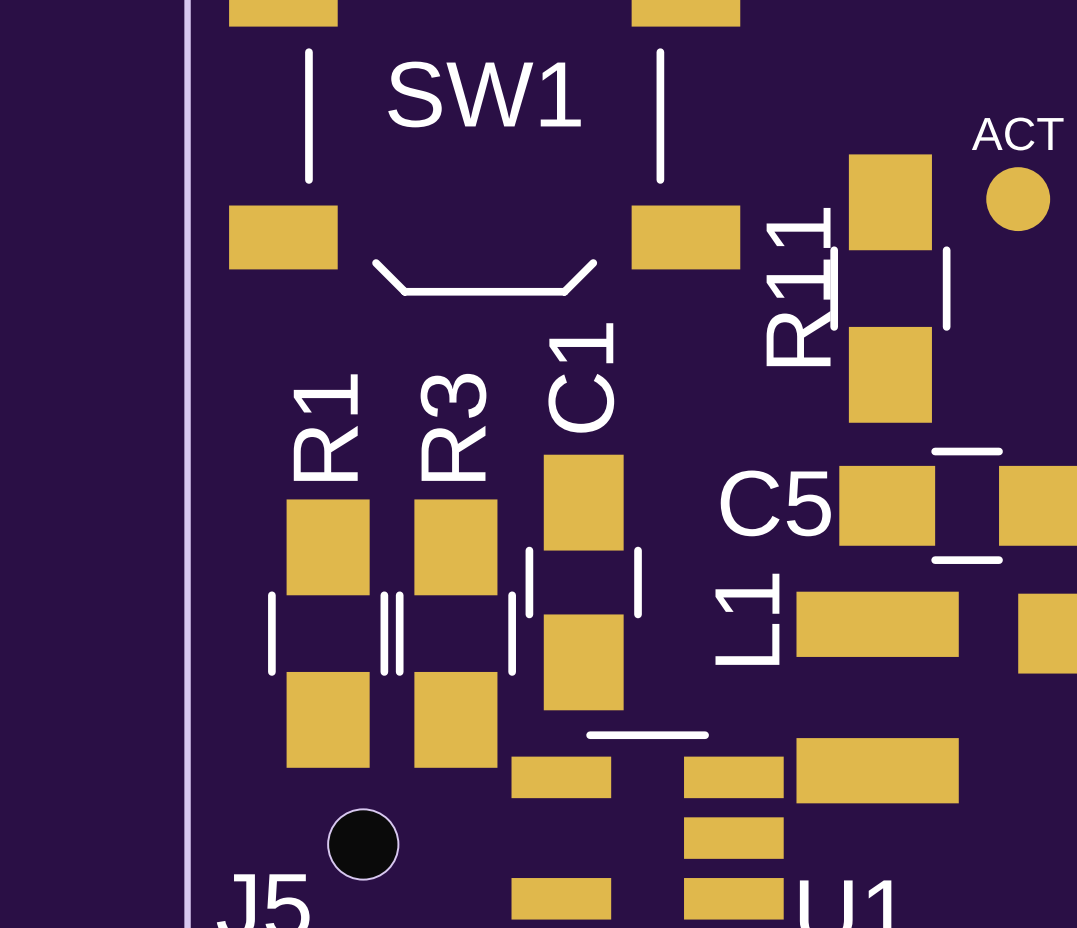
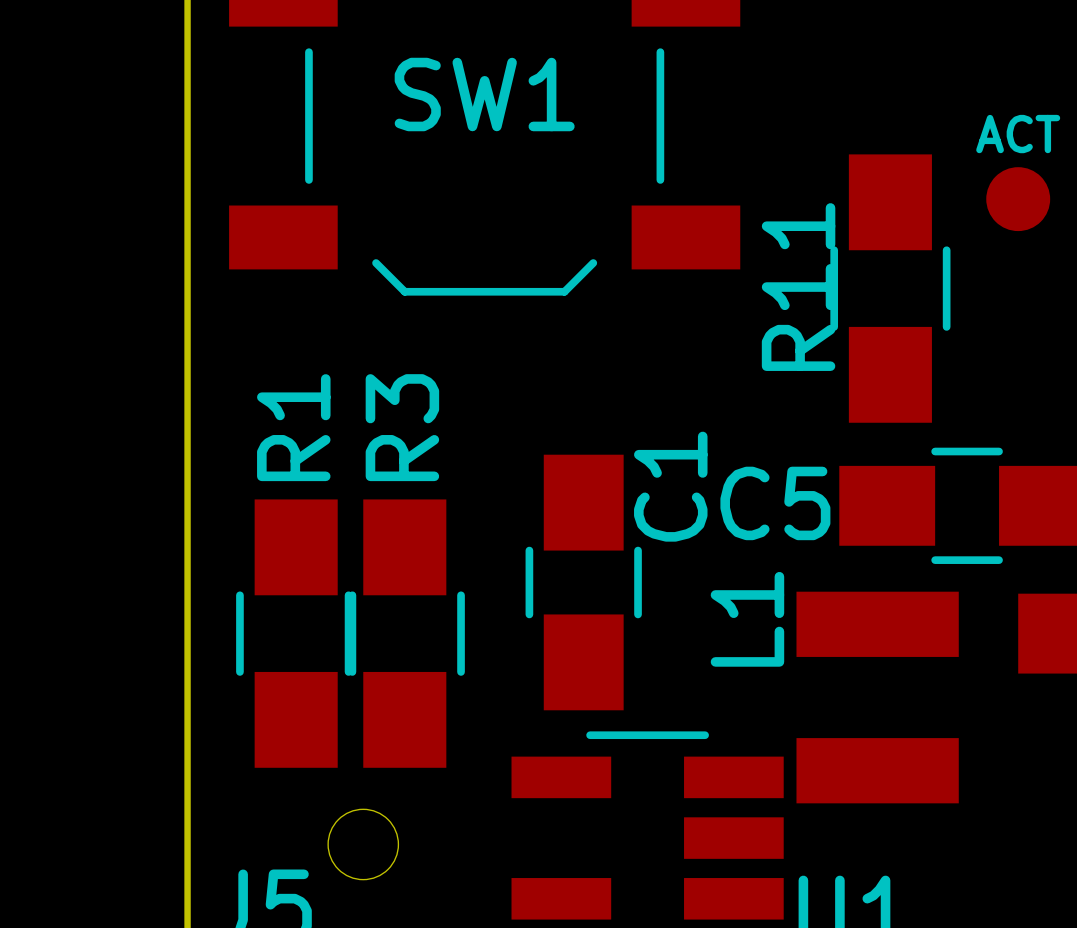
C1 name position: C1 (581, 377) -> C1 (670, 486)
R1 position: (328, 633) -> (296, 633)
R3 position: (455, 633) -> (404, 633)

